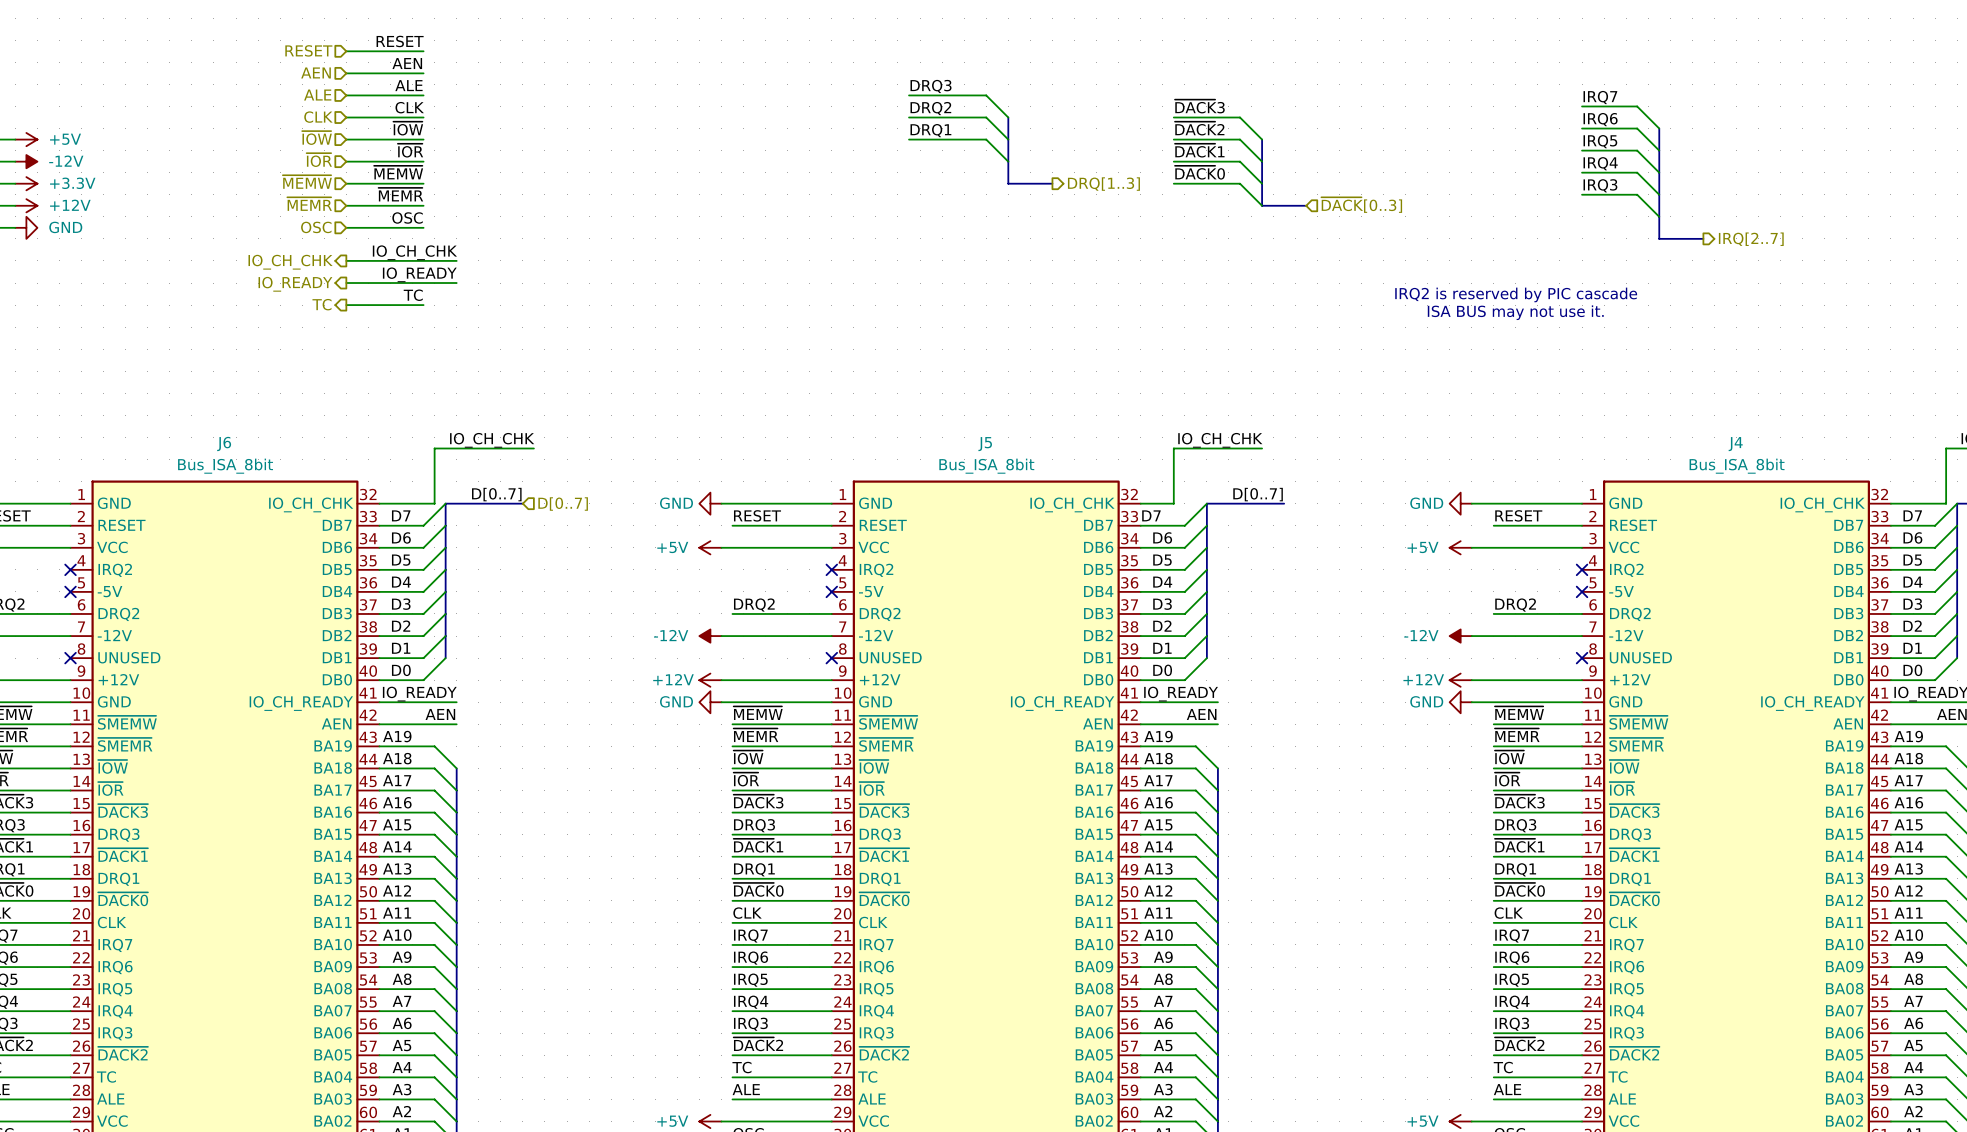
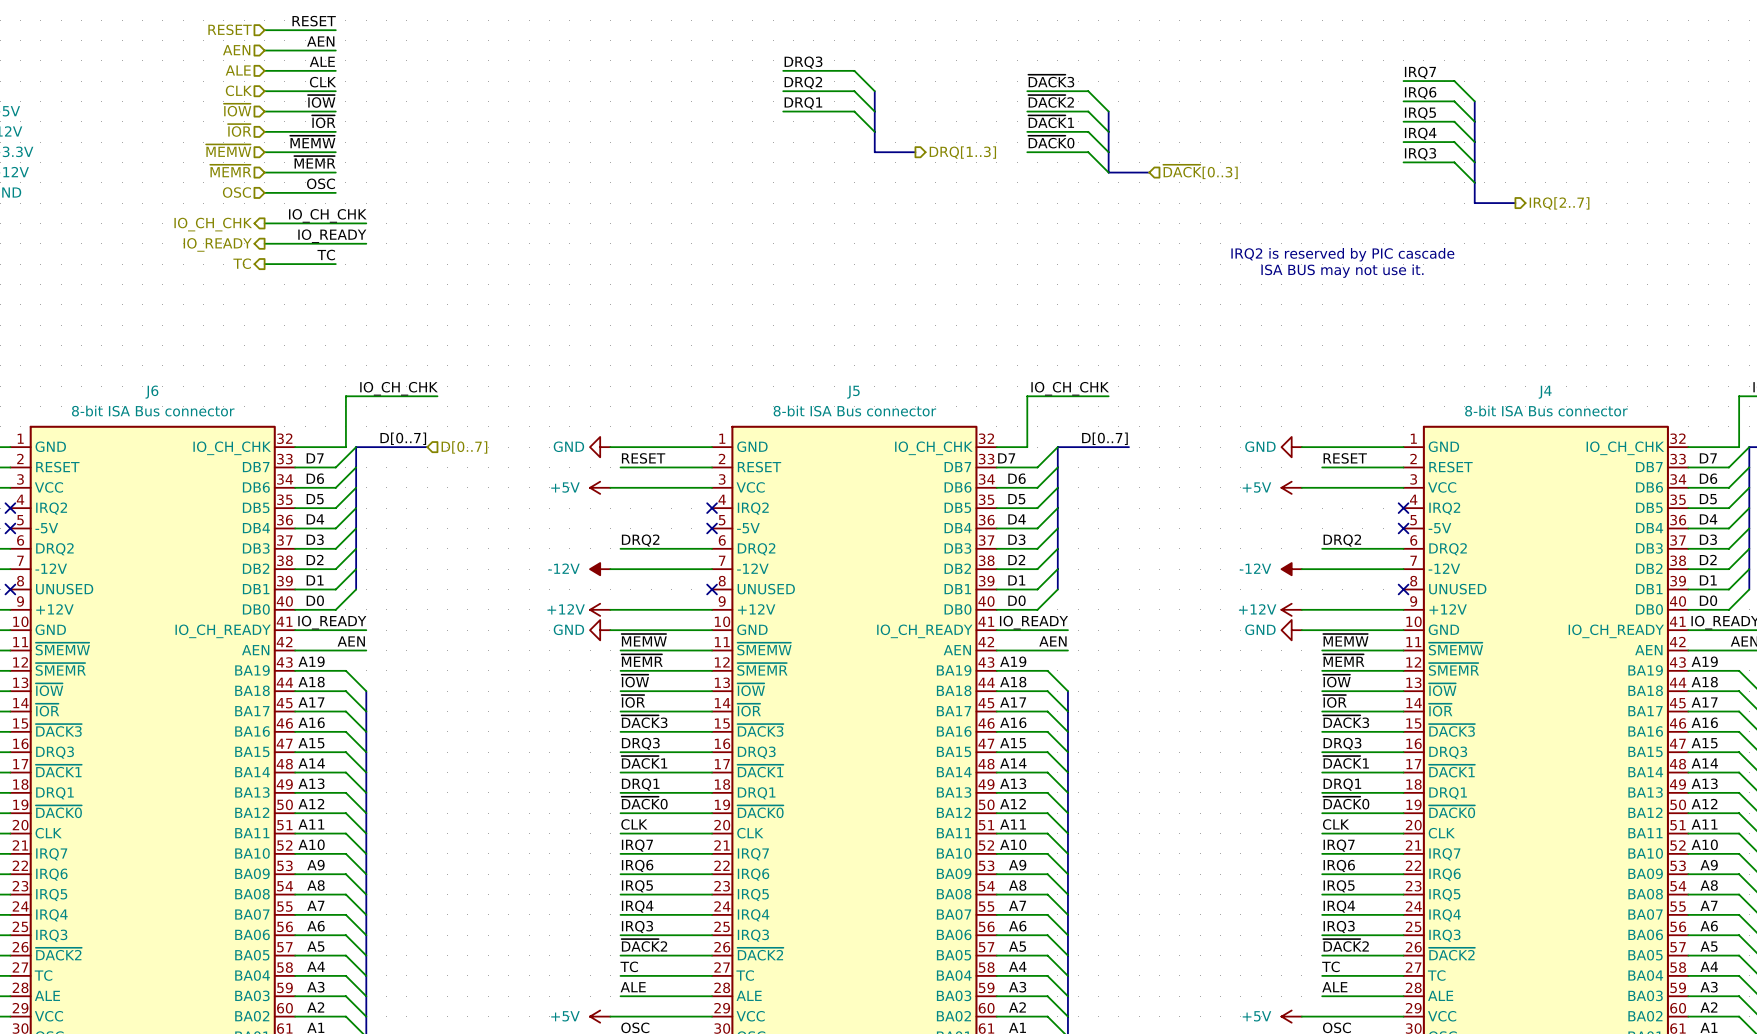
J6 value: Bus_ISA_8bit (225, 466) -> 8-bit ISA Bus connector (153, 411)
J5 value: Bus_ISA_8bit (986, 466) -> 8-bit ISA Bus connector (854, 411)
J4 value: Bus_ISA_8bit (1737, 466) -> 8-bit ISA Bus connector (1546, 411)

